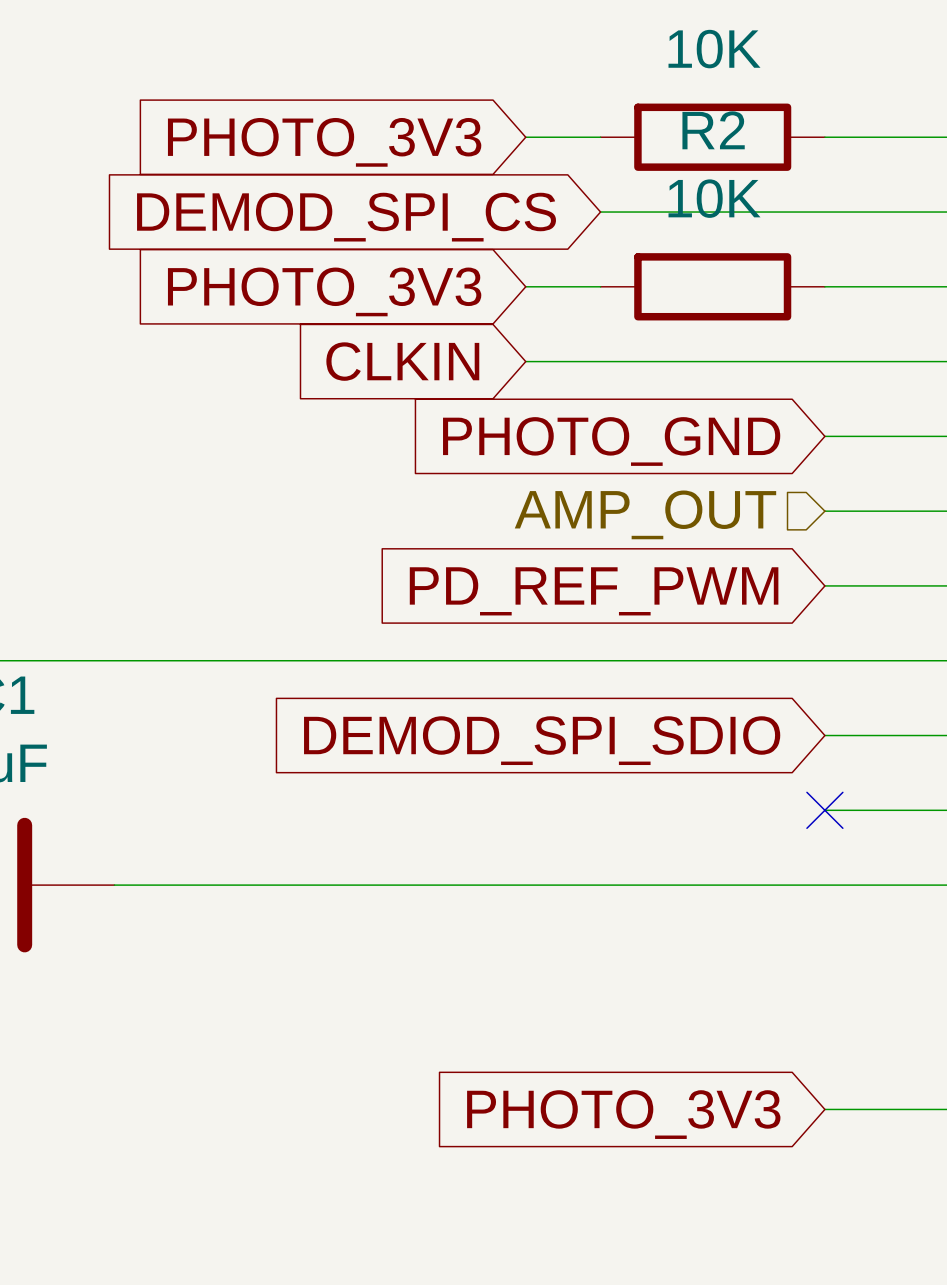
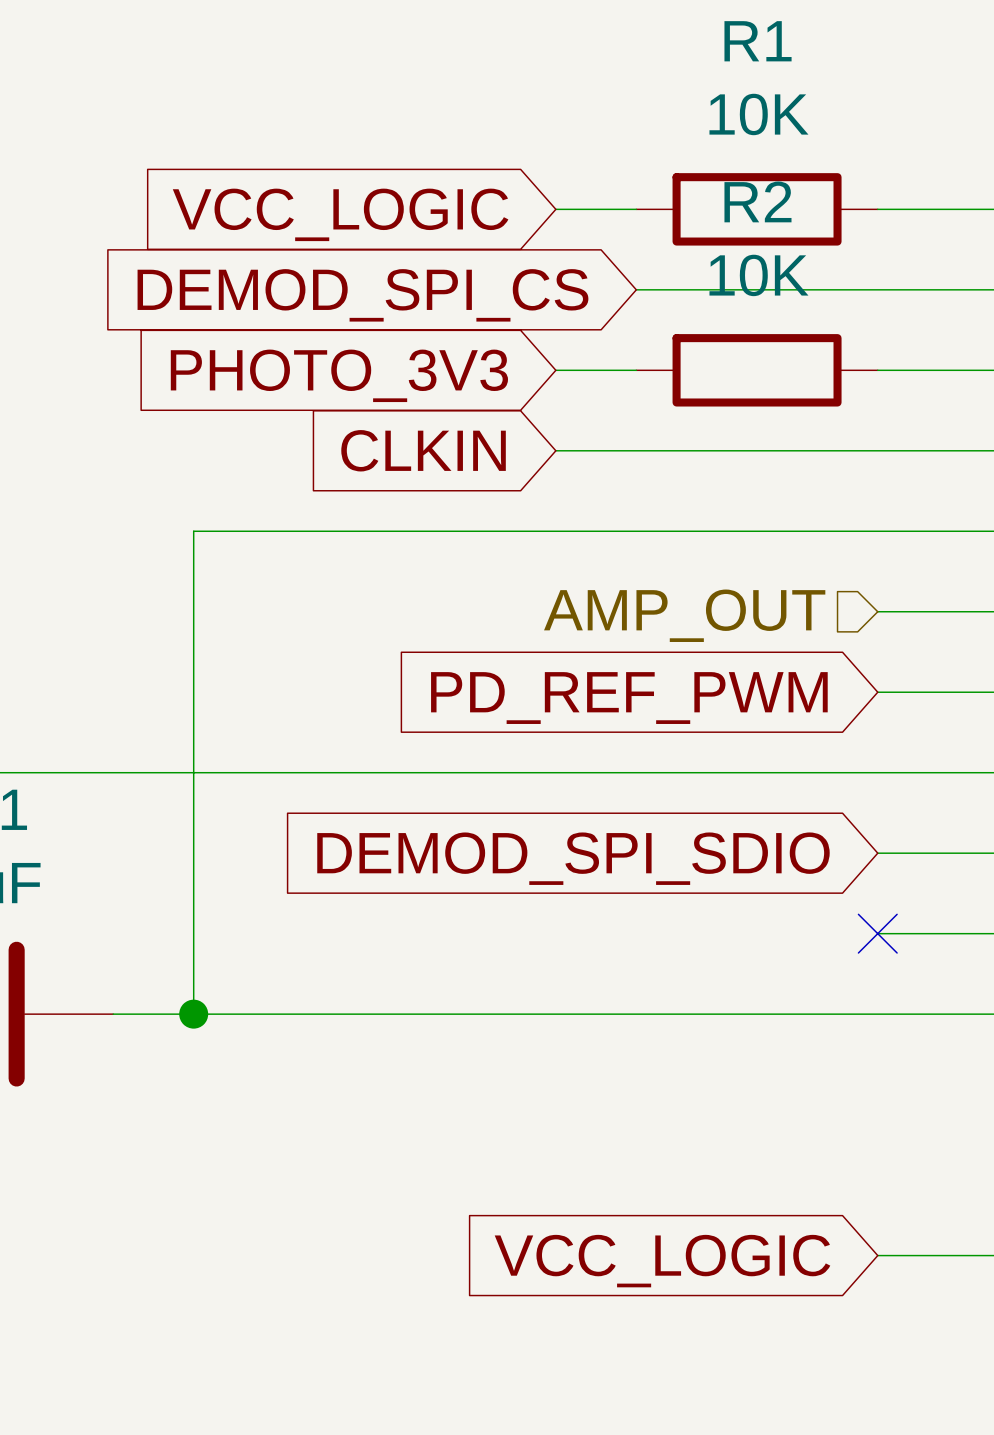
global label: PHOTO_3V3 (324, 142) -> VCC_LOGIC (340, 214)
wire: none -> (877, 531) (193, 531) (193, 1014)
global label: PHOTO_GND (611, 441) -> none
junction: none -> (193, 1014)
global label: PHOTO_3V3 (623, 1114) -> VCC_LOGIC (662, 1261)

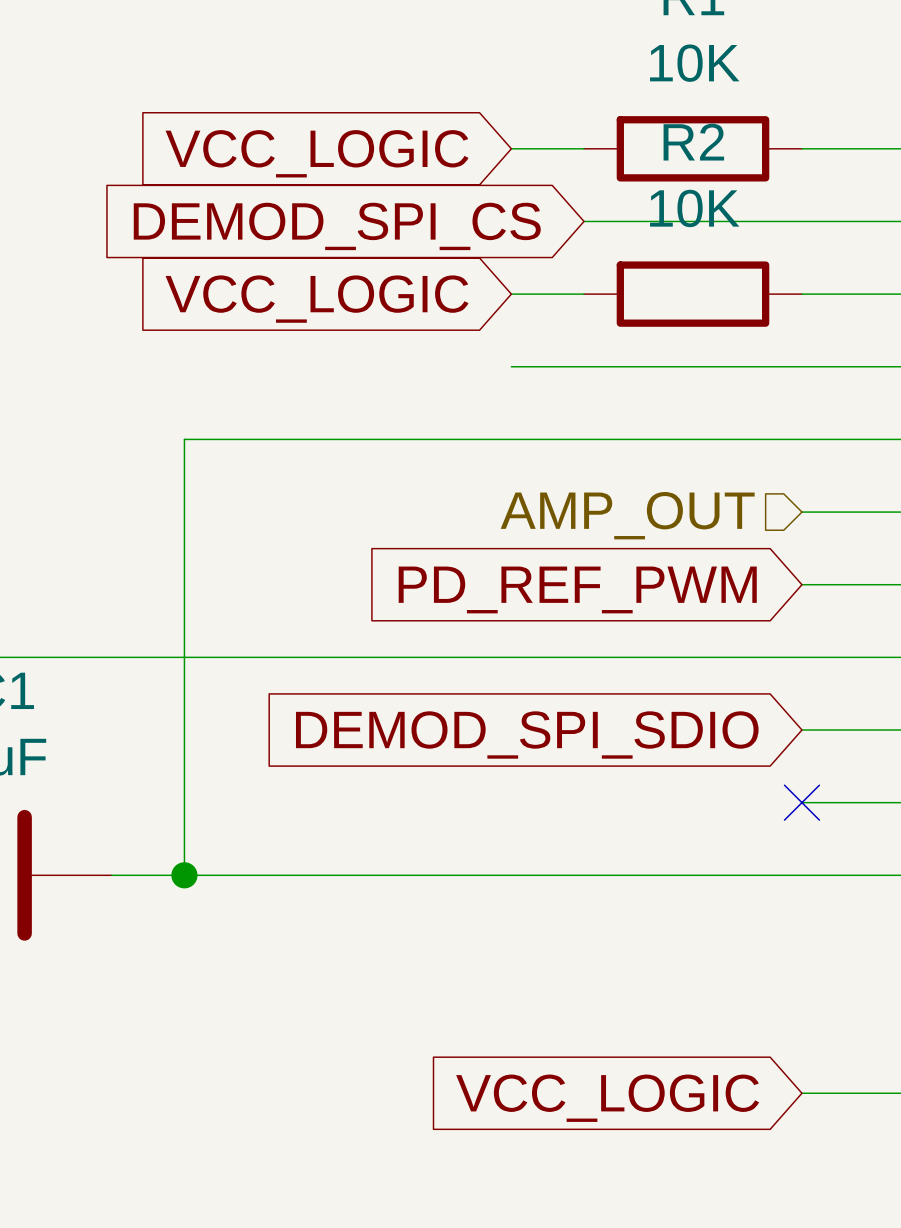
global label: PHOTO_3V3 (339, 375) -> VCC_LOGIC (317, 299)
global label: CLKIN (423, 450) -> none

